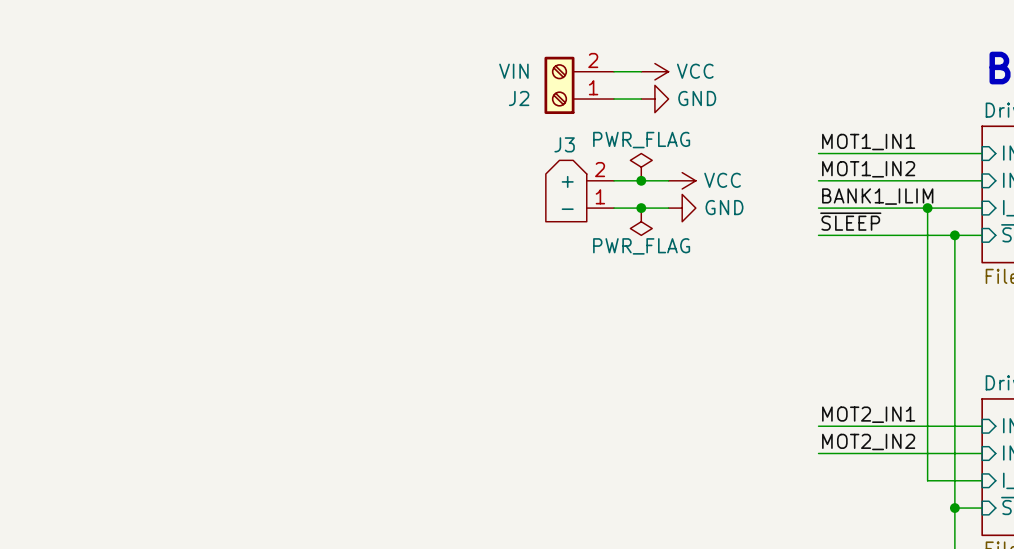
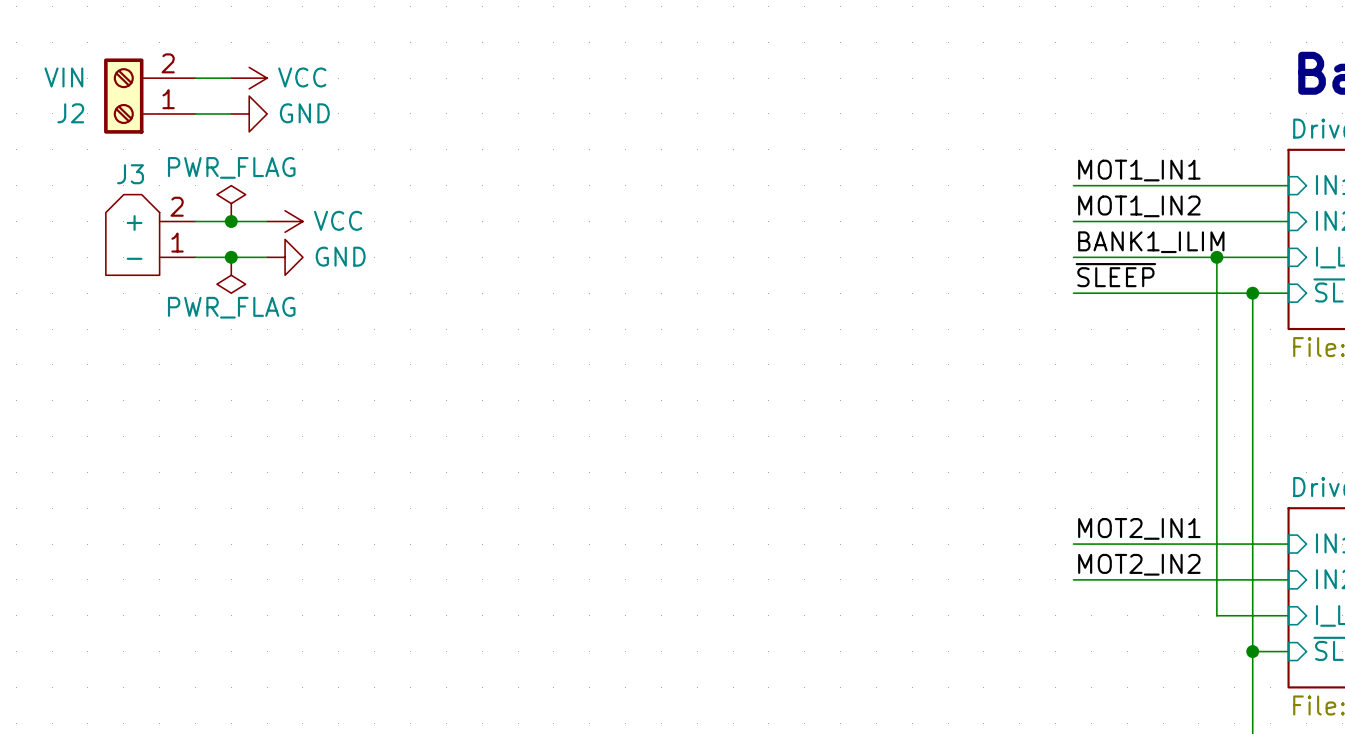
wire: none -> (195, 78) (231, 78)
power symbol: none -> VCC (249, 78)
wire: (614, 71) (641, 71) -> none
power symbol: VCC (654, 71) -> none
J2 position: (579, 85) -> (149, 96)
wire: none -> (195, 113) (231, 113)
power symbol: none -> GND (249, 113)
wire: (614, 99) (641, 99) -> none
power symbol: GND (654, 99) -> none
power symbol: none -> PWR_FLAG (231, 203)
power symbol: PWR_FLAG (641, 167) -> none
wire: none -> (195, 221) (267, 221)
junction: none -> (231, 221)
power symbol: none -> VCC (285, 221)
wire: (614, 180) (668, 180) -> none
junction: (641, 180) -> none
power symbol: VCC (682, 180) -> none
J3 position: (579, 191) -> (150, 234)
wire: none -> (195, 257) (267, 257)
junction: none -> (231, 257)
power symbol: none -> GND (285, 257)
wire: (614, 208) (668, 208) -> none
junction: (641, 208) -> none
power symbol: GND (682, 208) -> none
power symbol: none -> PWR_FLAG (231, 275)
power symbol: PWR_FLAG (641, 221) -> none

